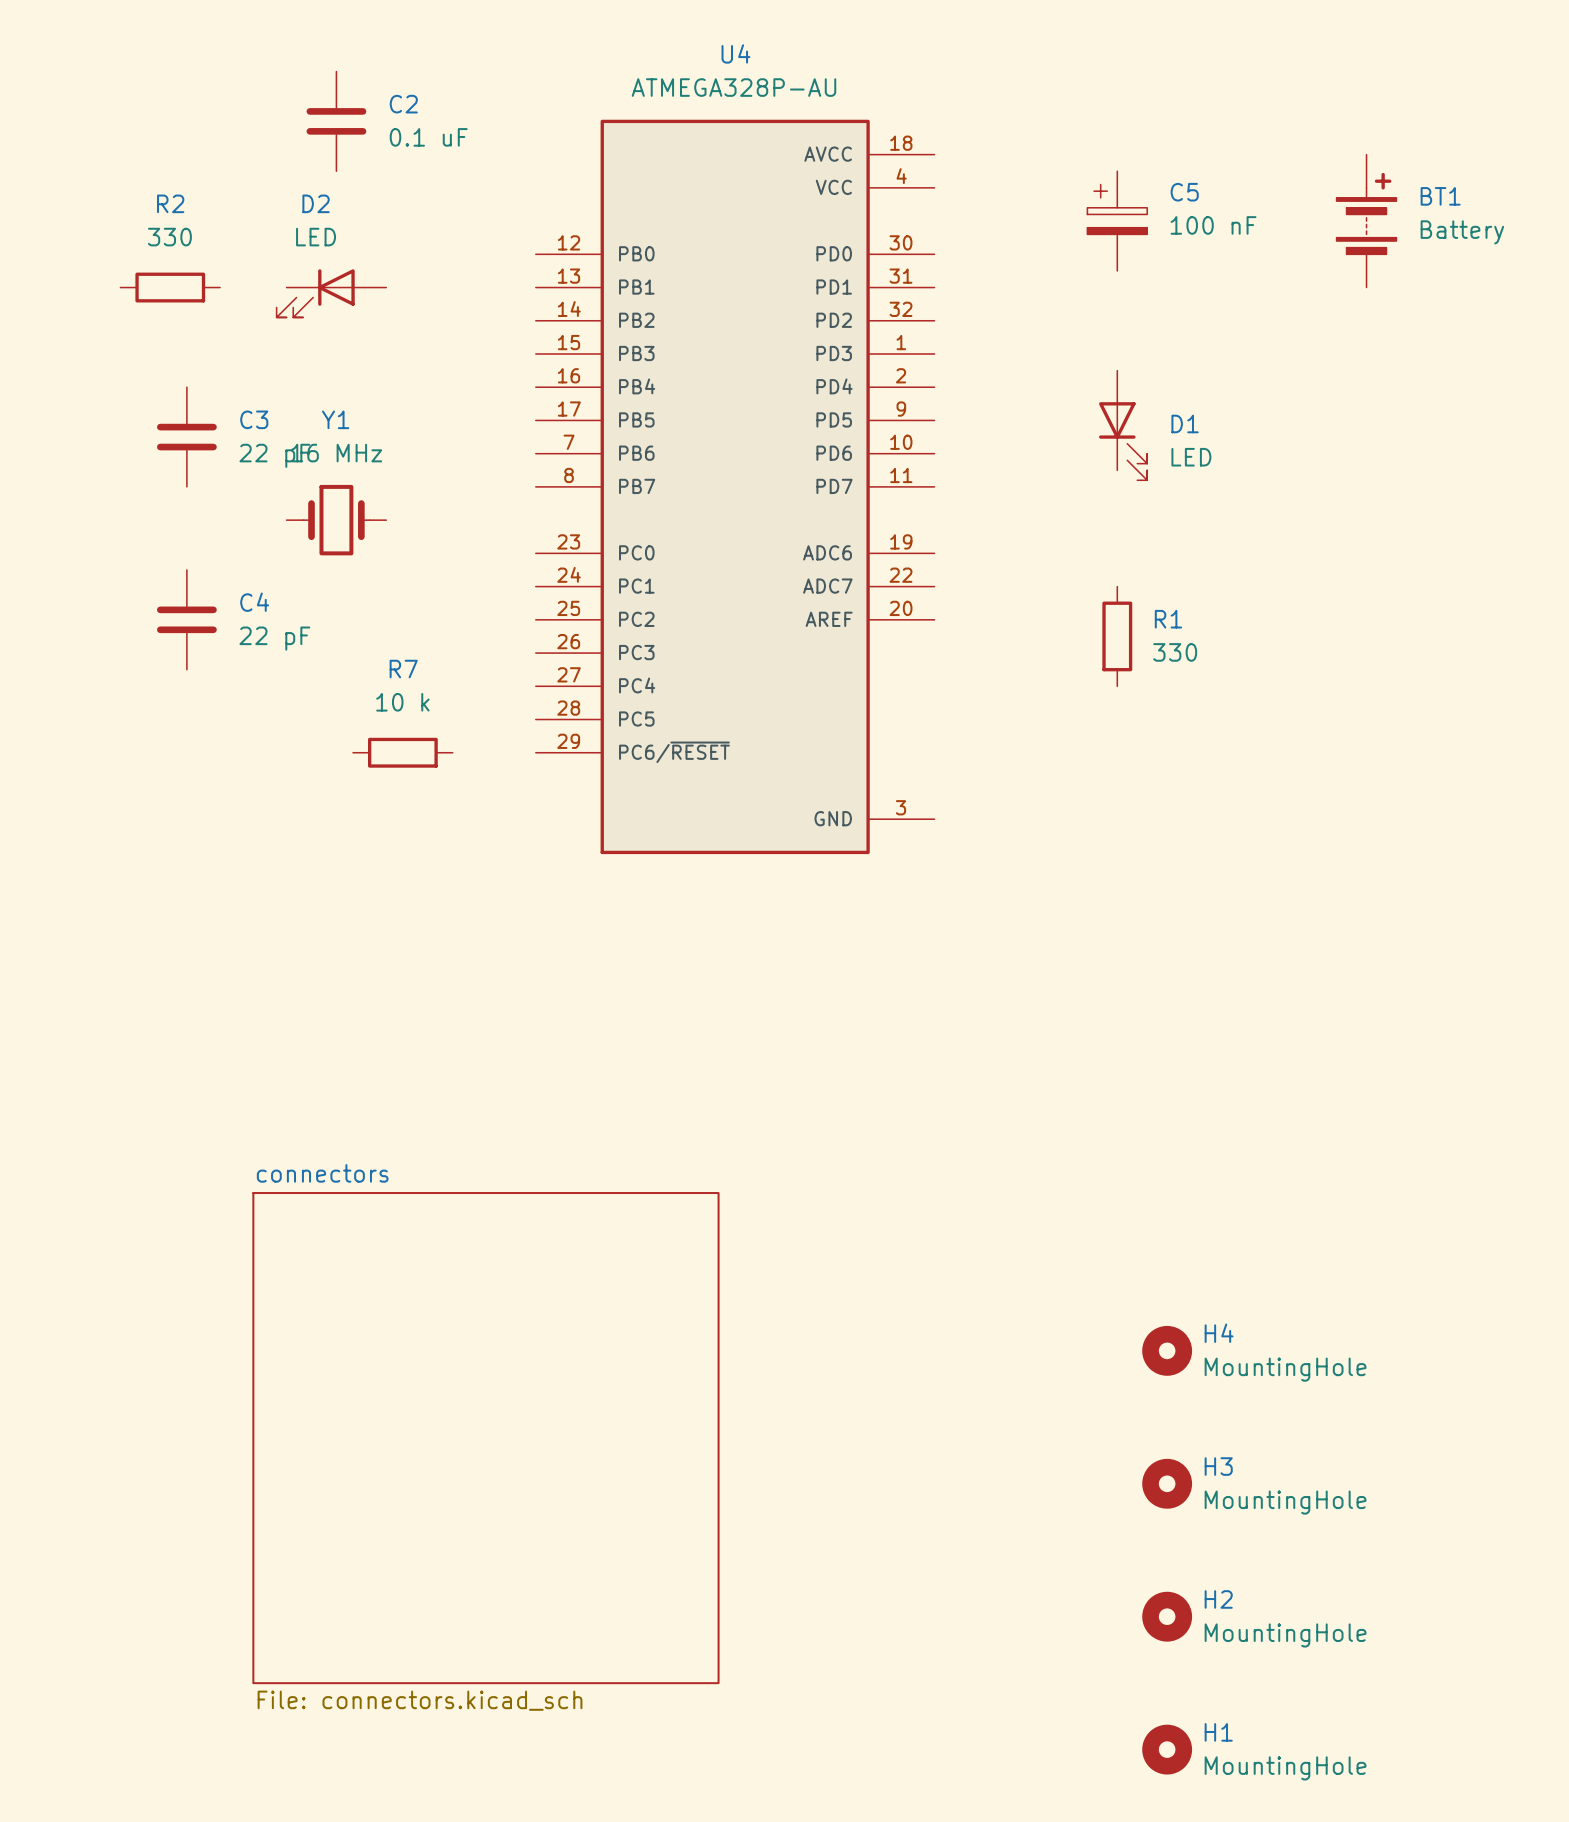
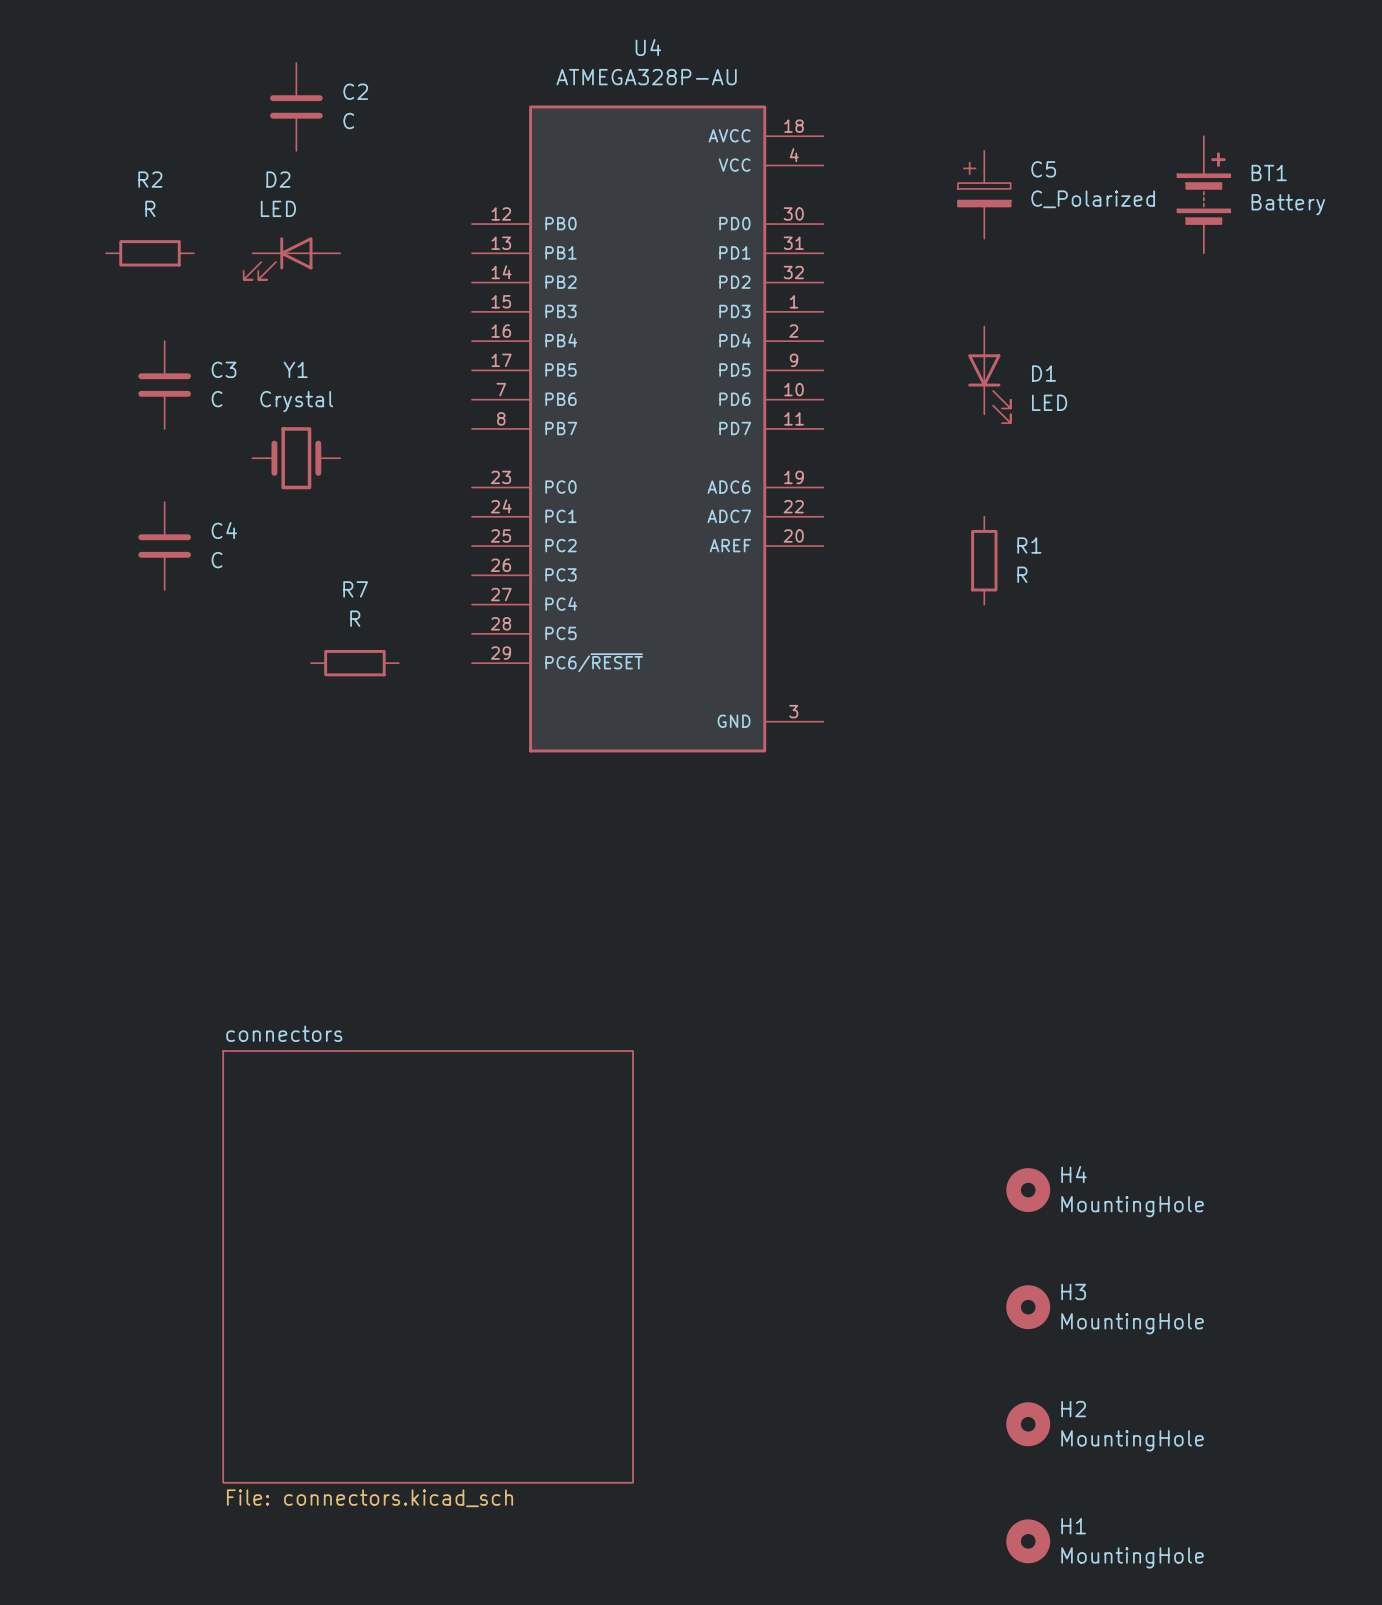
C2 value: 0.1 uF (428, 137) -> C (348, 121)
C5 value: 100 nF (1213, 225) -> C_Polarized (1093, 199)
R2 value: 330 (169, 237) -> R (150, 208)
Y1 value: 16 MHz (336, 453) -> Crystal (296, 401)
C3 value: 22 pF (274, 455) -> C (217, 399)
C4 value: 22 pF (274, 638) -> C (217, 560)
R1 value: 330 (1175, 652) -> R (1022, 574)
R7 value: 10 k (402, 702) -> R (355, 618)

